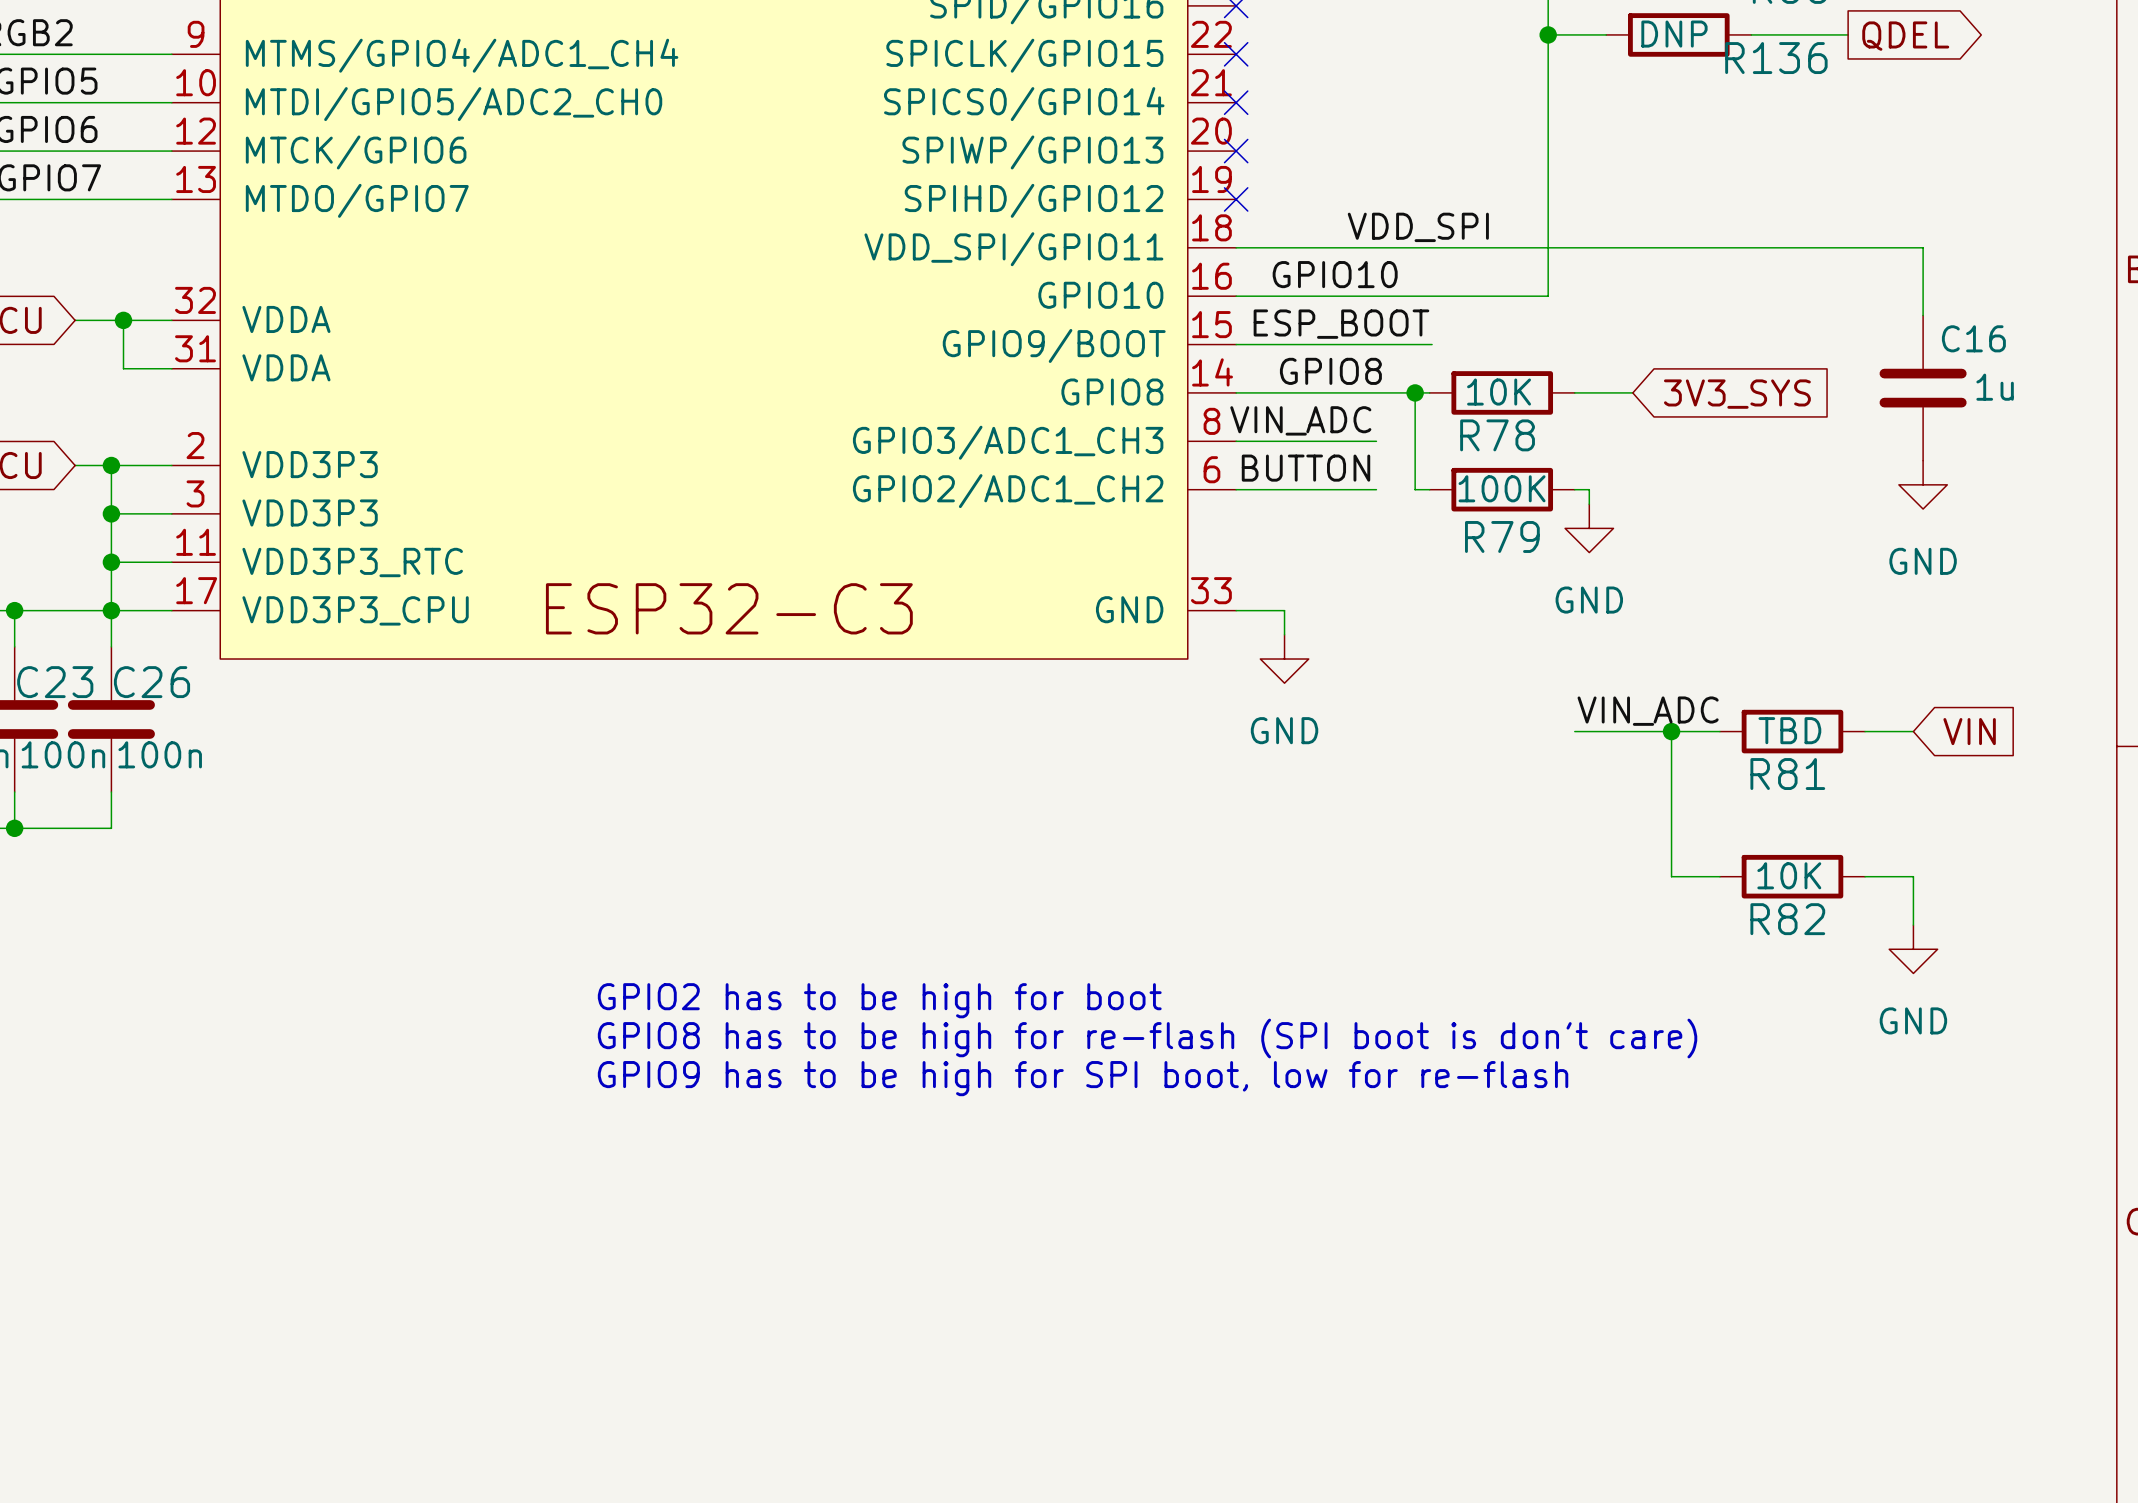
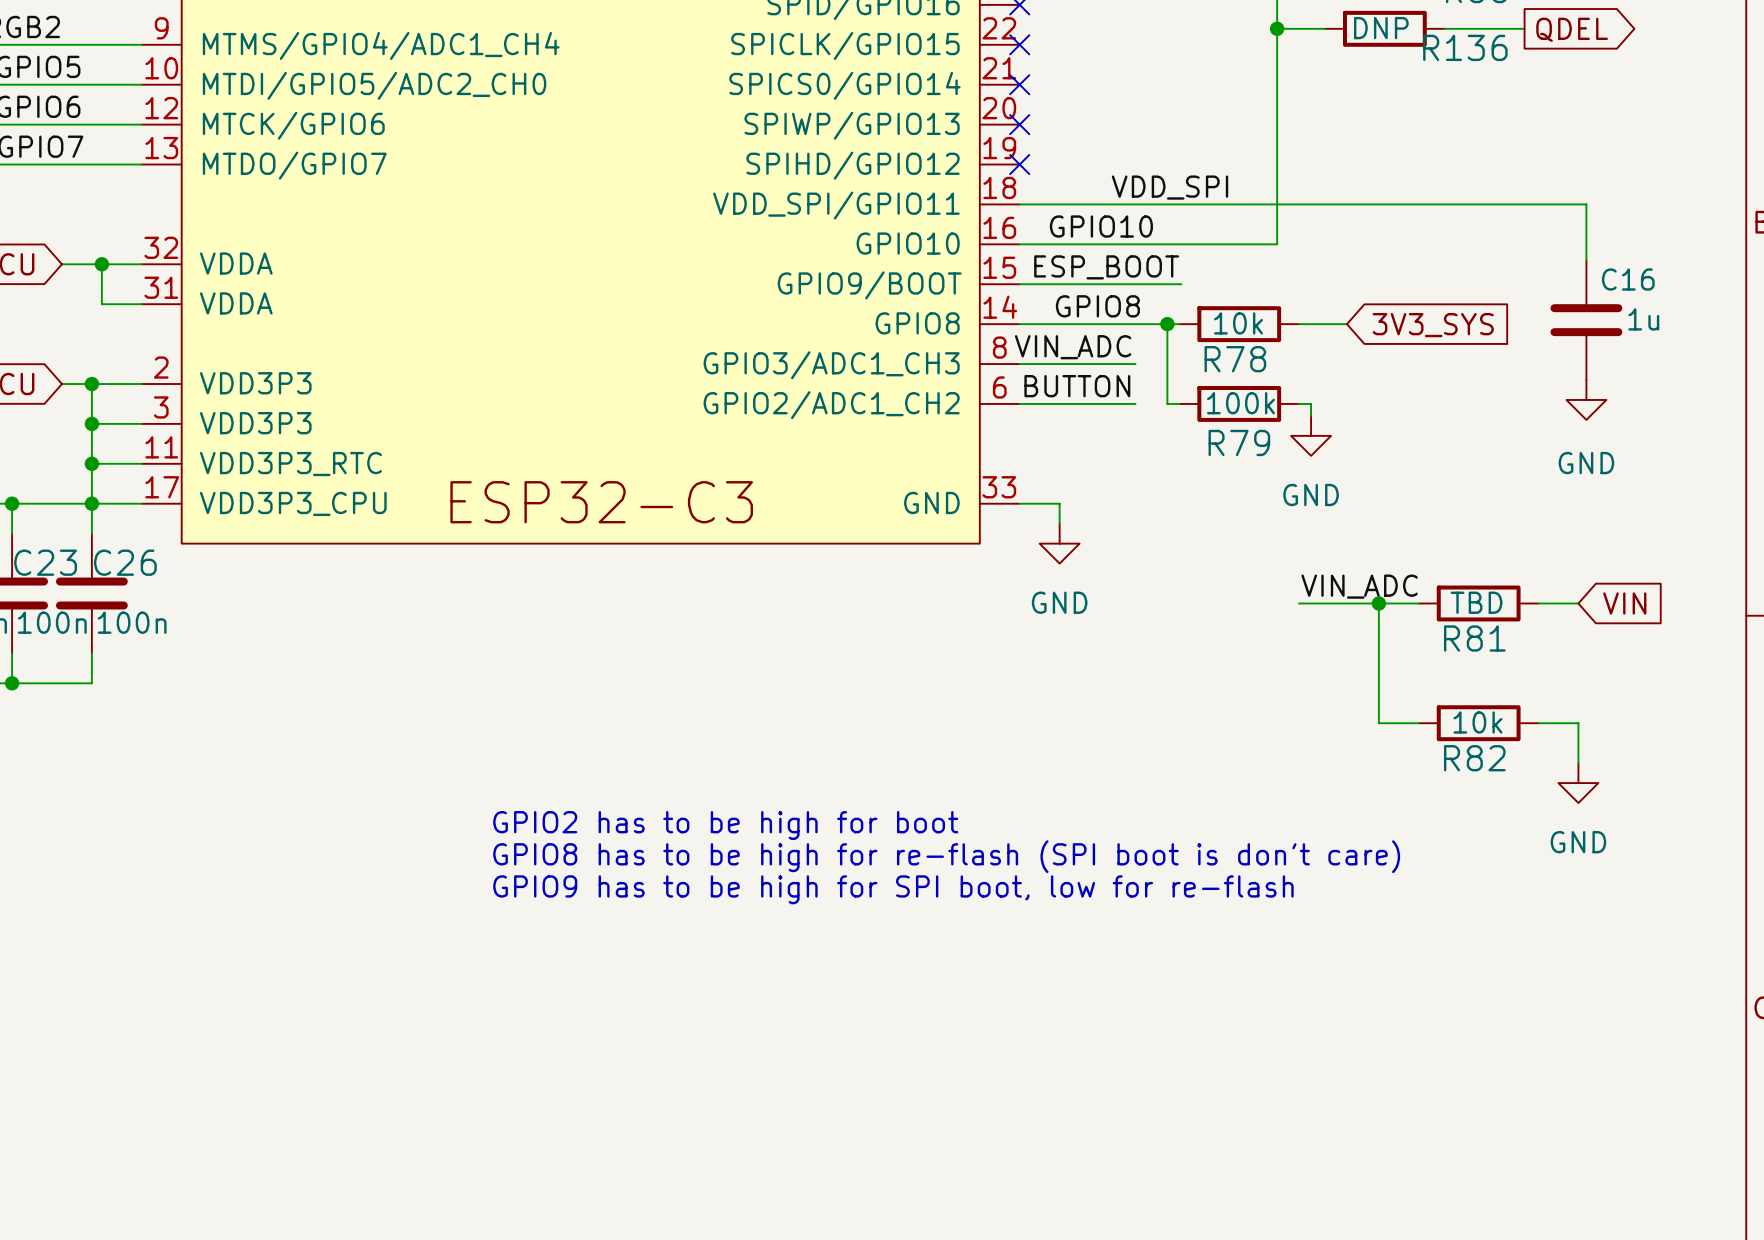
C16 text: none -> 1u (1643, 319)
C16 value: 1u (1995, 387) -> none
R78 text: 10K (1499, 392) -> 10k (1238, 323)
R79 text: 100K (1502, 488) -> 100k (1240, 403)
R82 text: 10K (1789, 875) -> 10k (1477, 722)

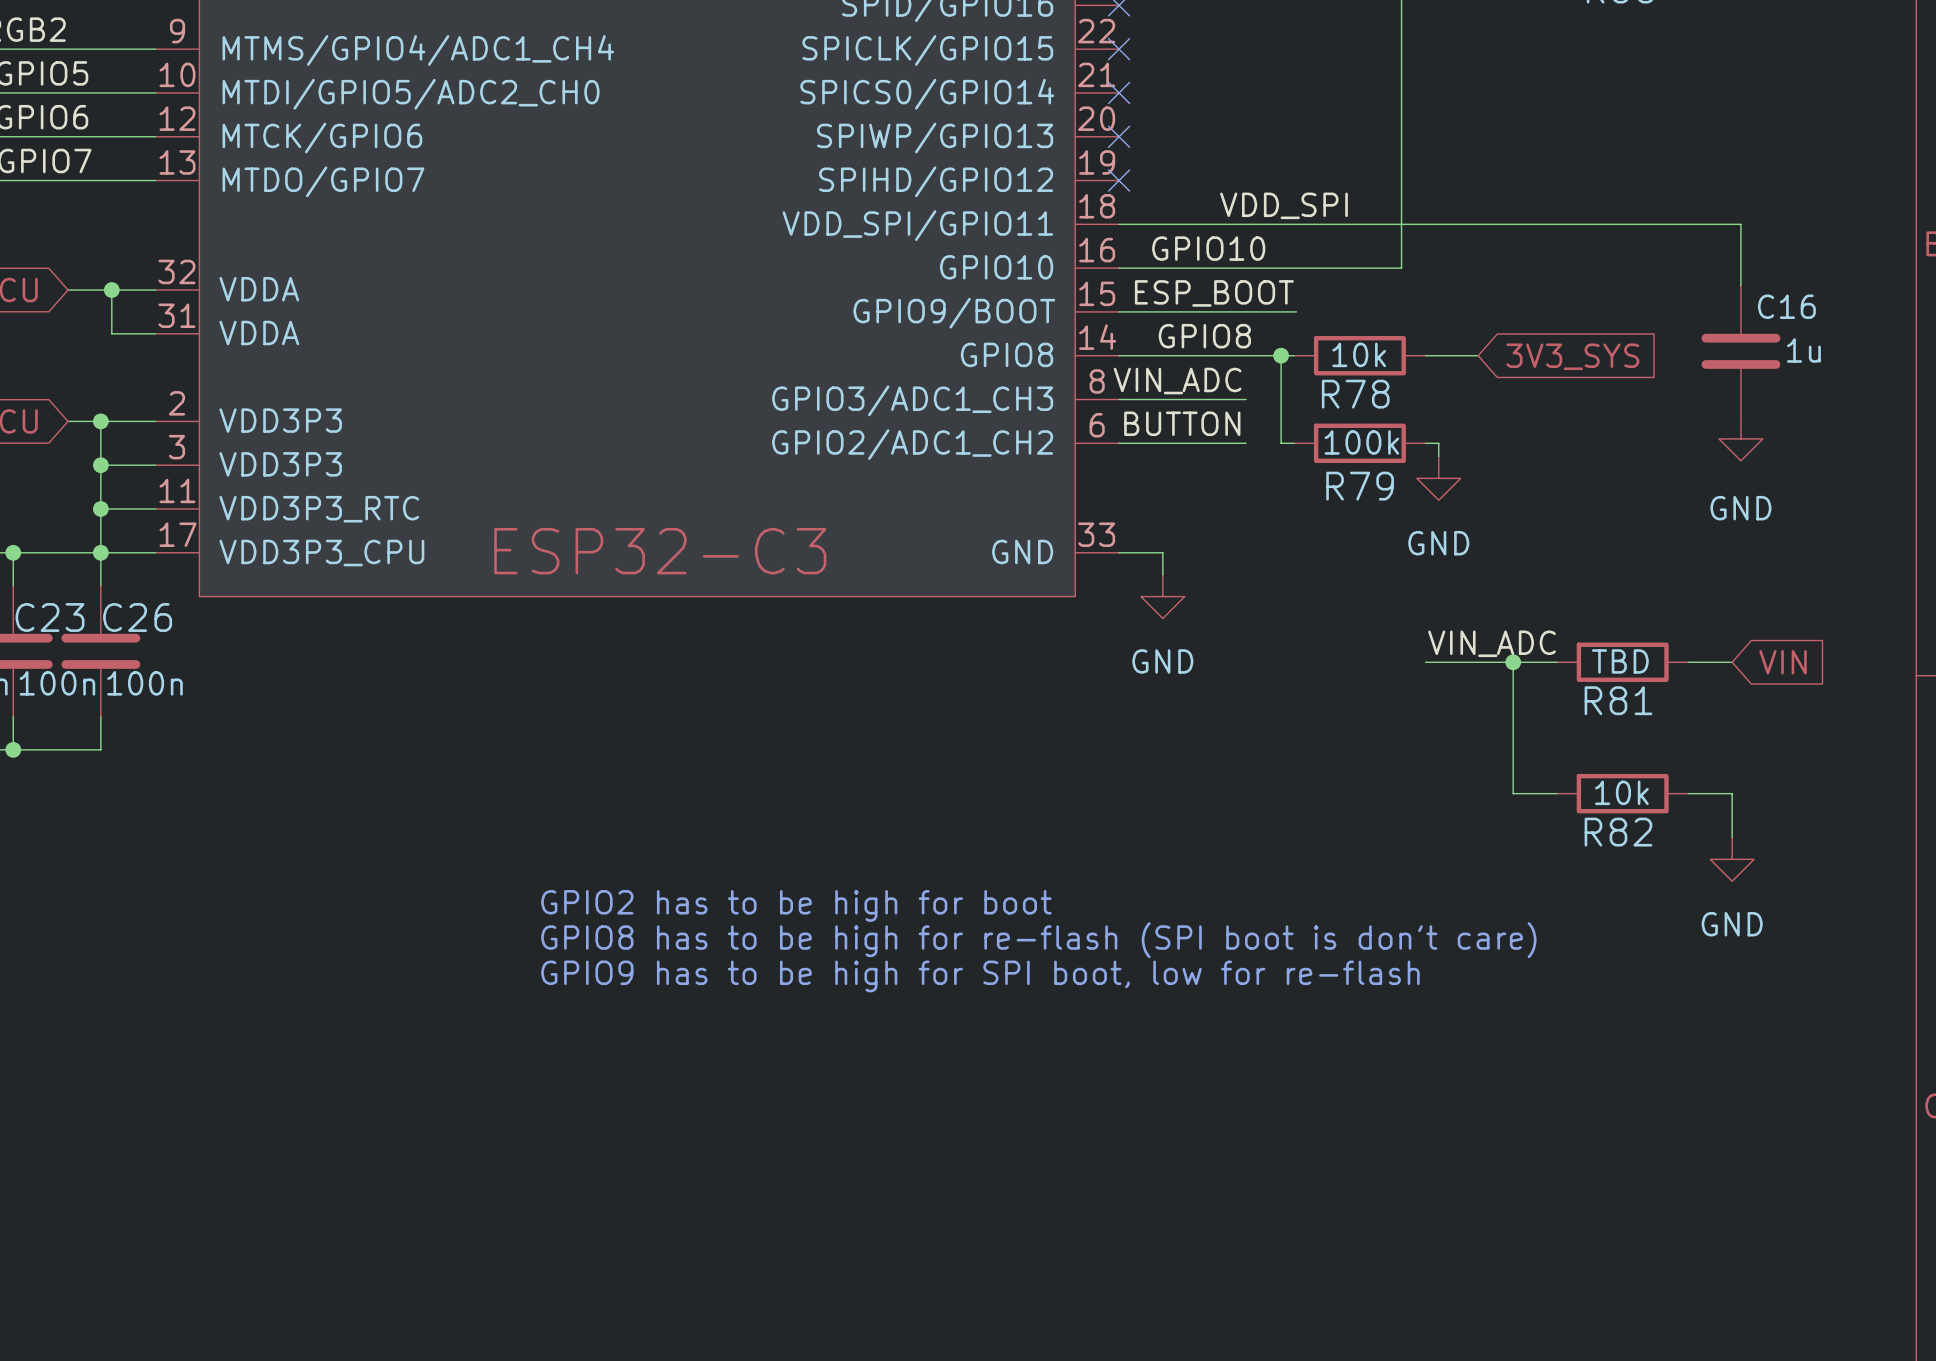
wire: (1277, 28) (1325, 28) -> none
junction: (1277, 28) -> none
R136: (1384, 28) -> none
wire: (1444, 28) (1524, 28) -> none
global label: QDEL (1572, 29) -> none

